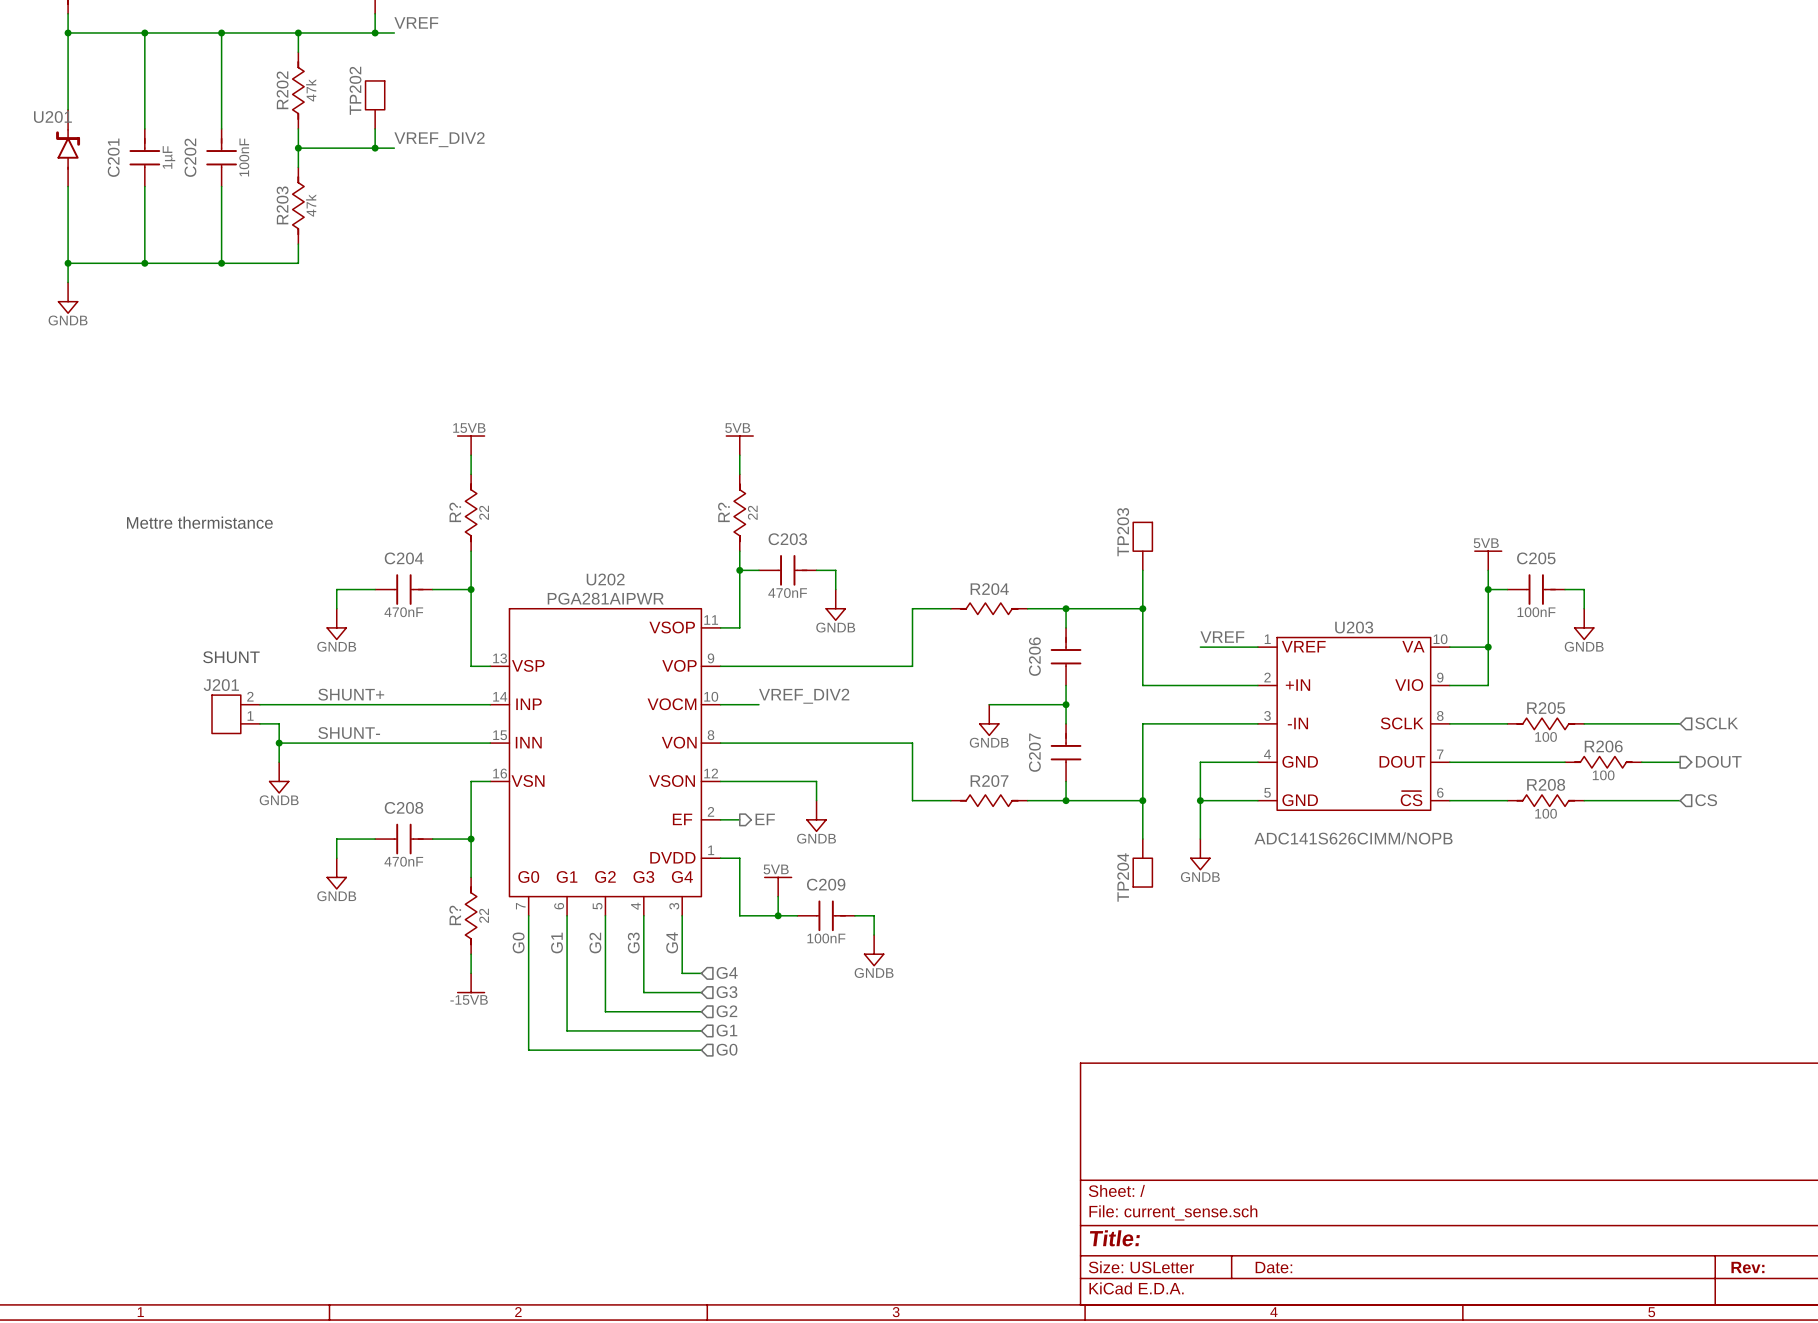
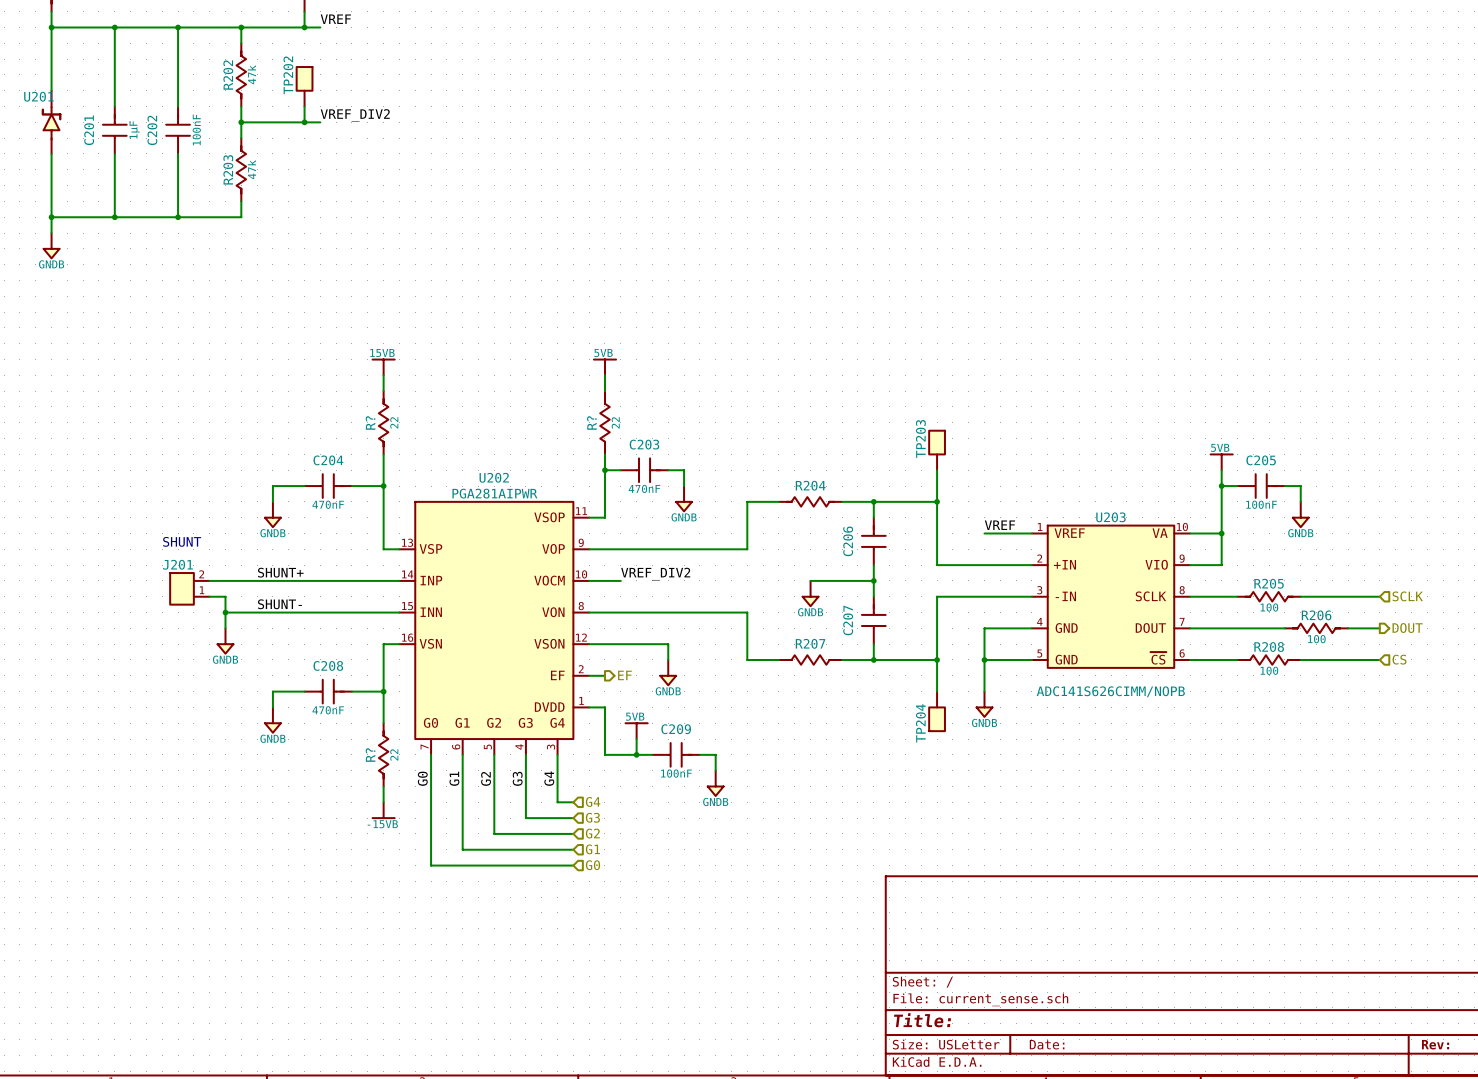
text: Mettre thermistance (199, 522) -> none

